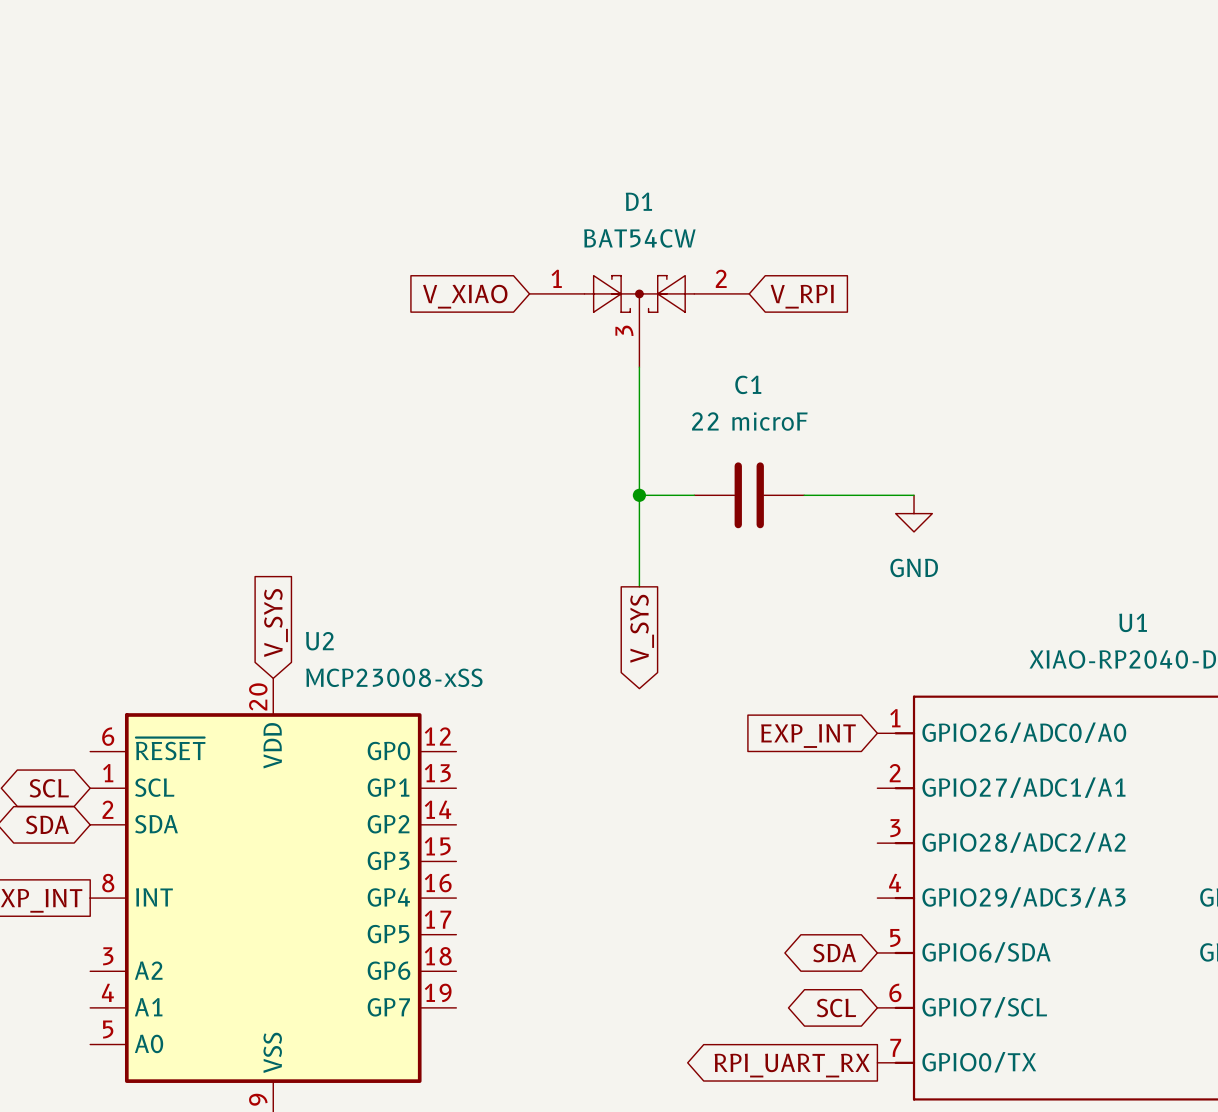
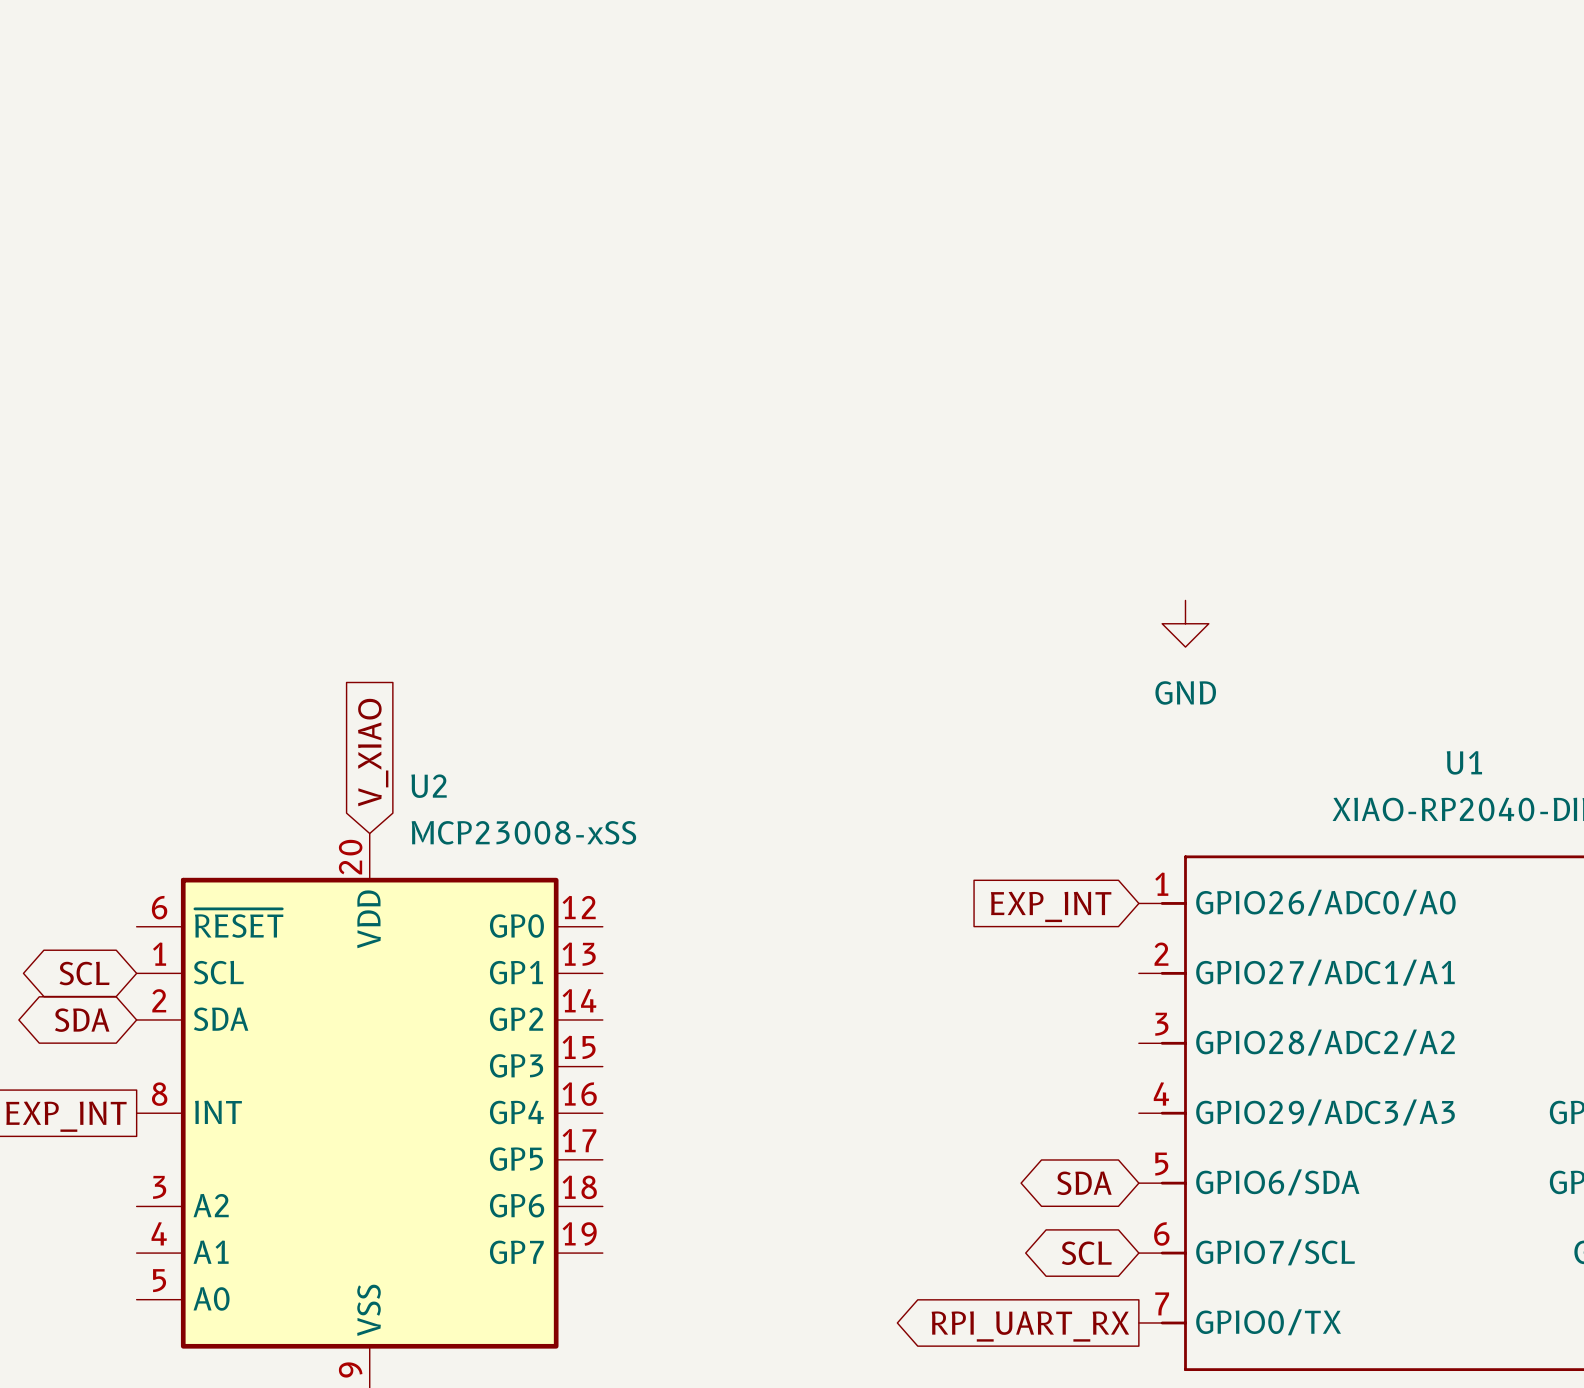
global label: V_XIAO (465, 296) -> none
global label: V_RPI (802, 296) -> none
D1: BAT54CW (639, 321) -> none
wire: (639, 367) (639, 586) -> none
wire: (639, 495) (694, 495) -> none
junction: (639, 495) -> none
C1: 22 microF (749, 495) -> none
wire: (804, 495) (914, 495) -> none
global label: V_SYS (276, 623) -> V_XIAO (373, 752)
global label: V_SYS (642, 628) -> none

